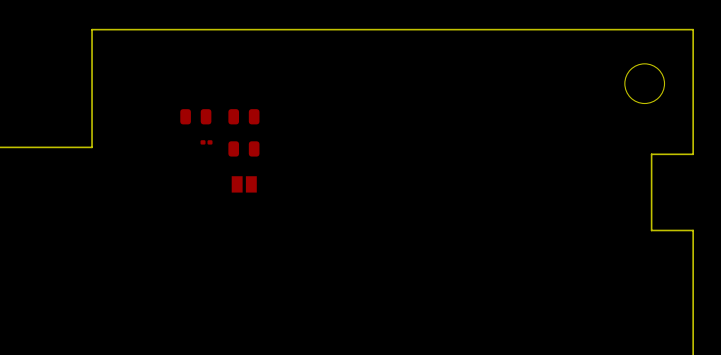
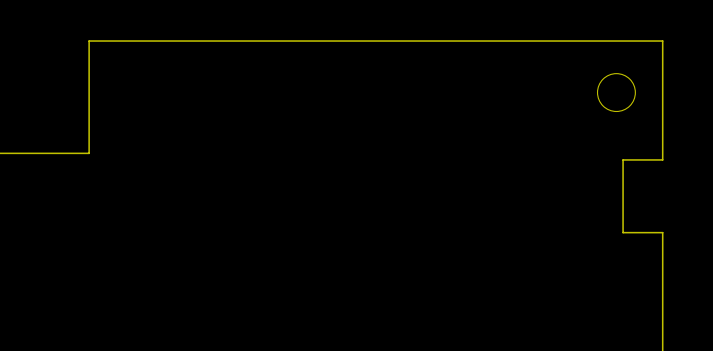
part: (195, 116) -> none
part: (243, 116) -> none
part: (206, 142) -> none
part: (243, 148) -> none
part: (244, 184) -> none

